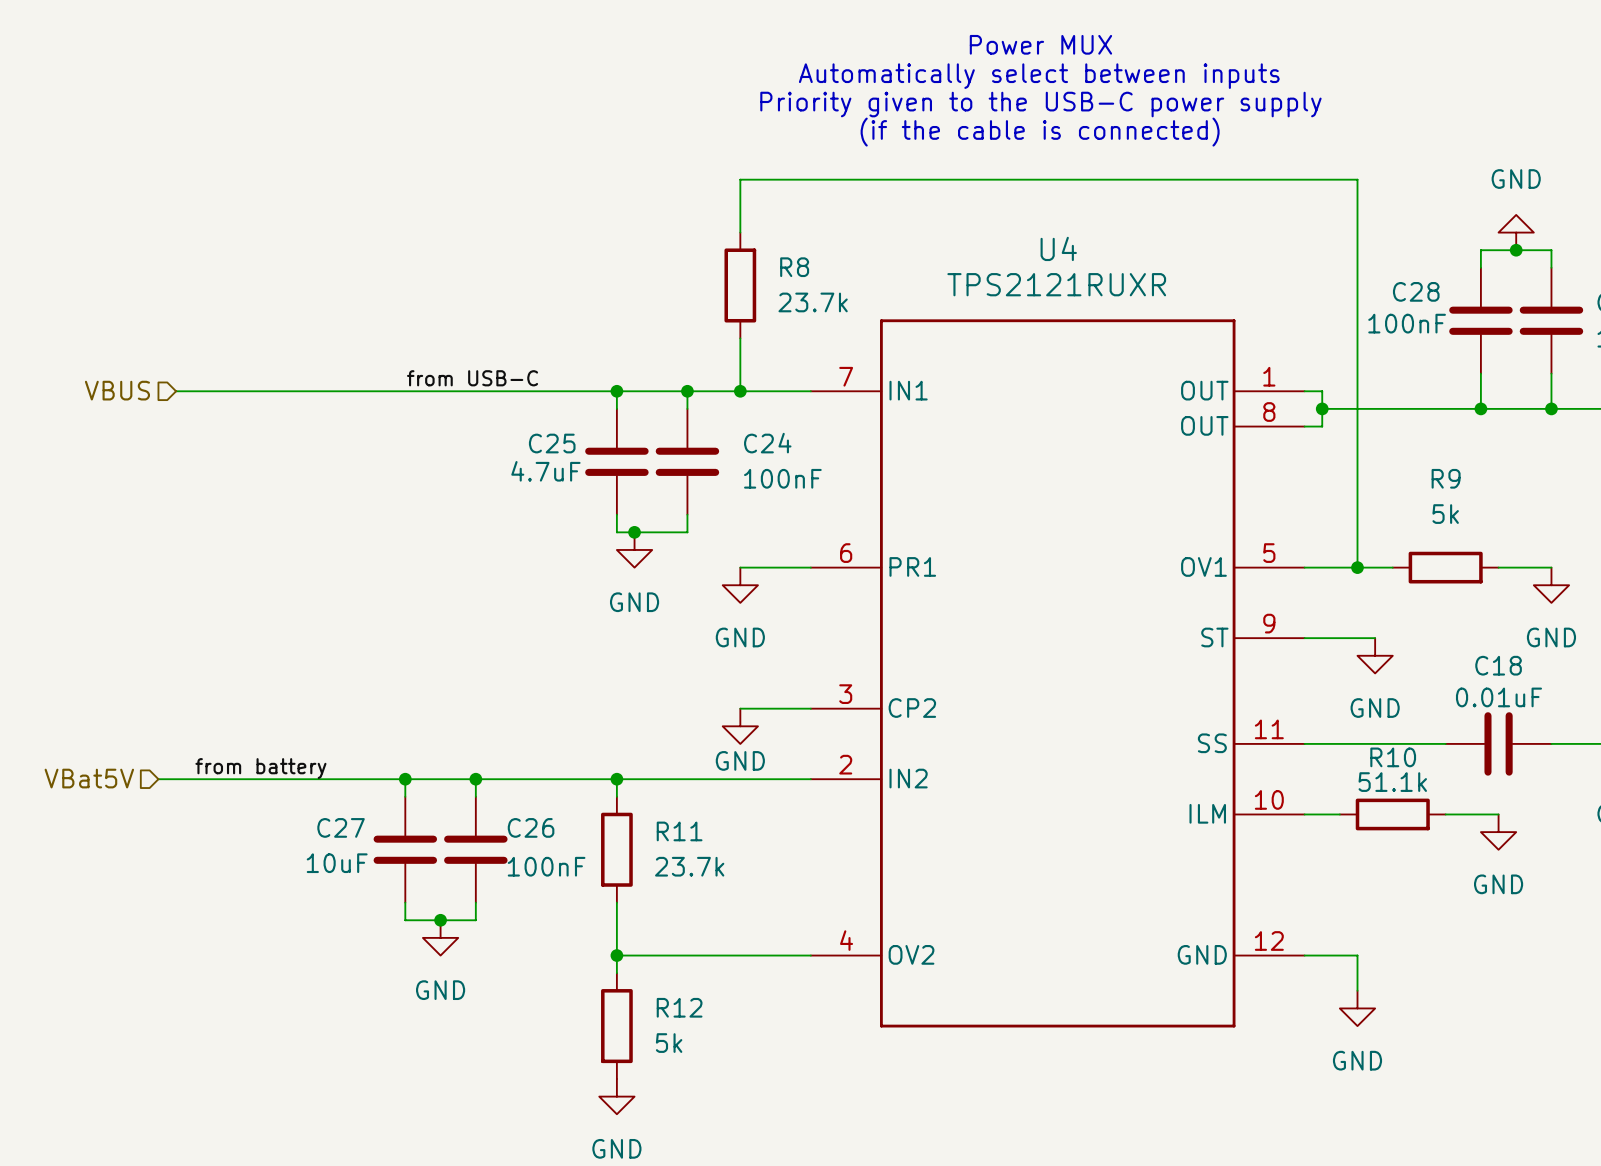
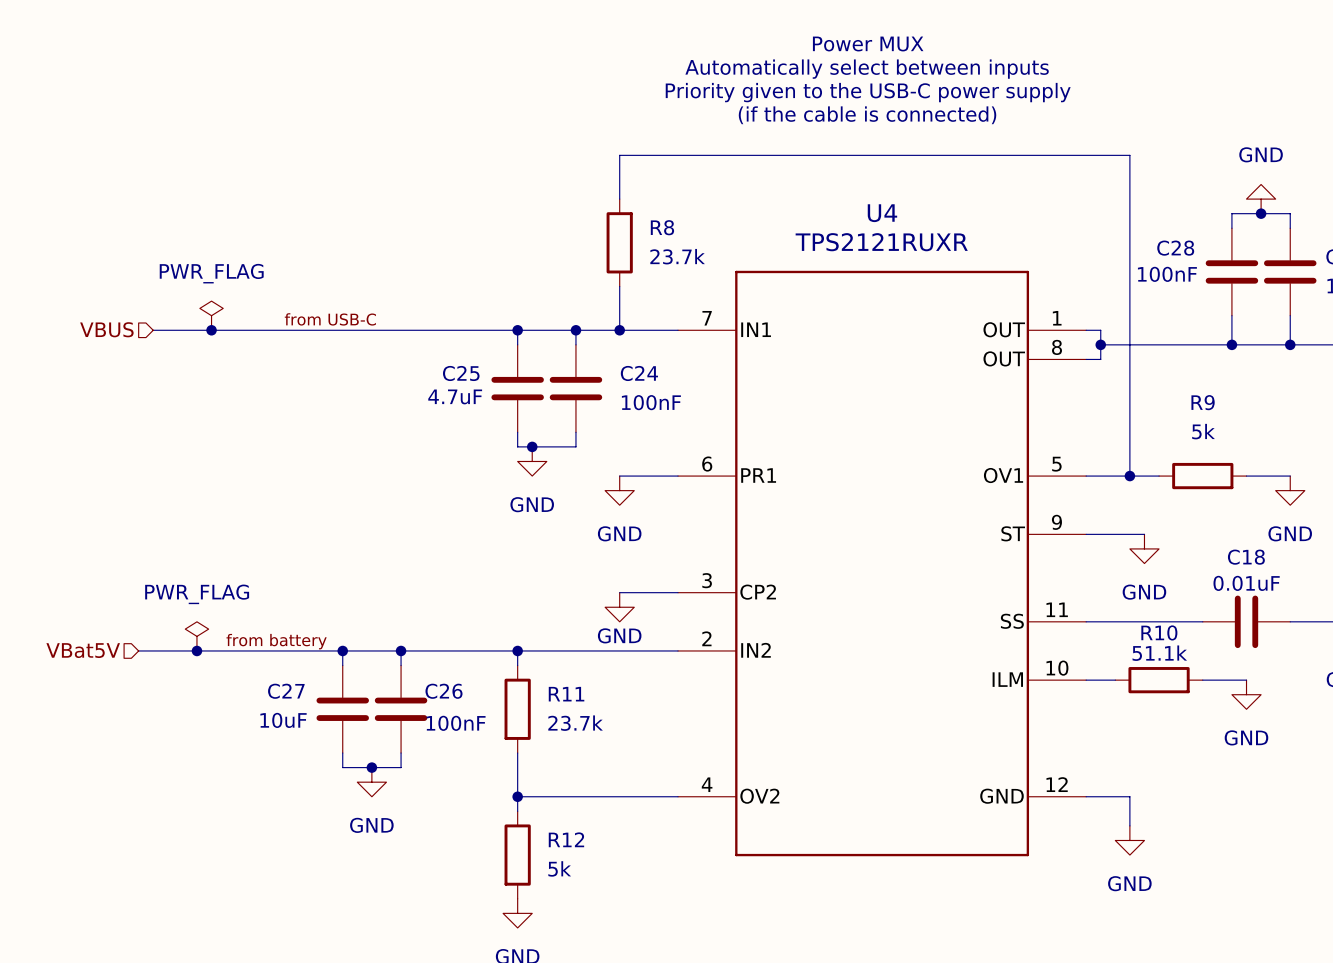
power symbol: none -> PWR_FLAG (211, 315)
label position: from USB-C (472, 378) -> from USB-C (330, 319)
junction: none -> (211, 330)
power symbol: none -> PWR_FLAG (196, 636)
label position: from battery (260, 768) -> from battery (276, 641)
junction: none -> (196, 650)

